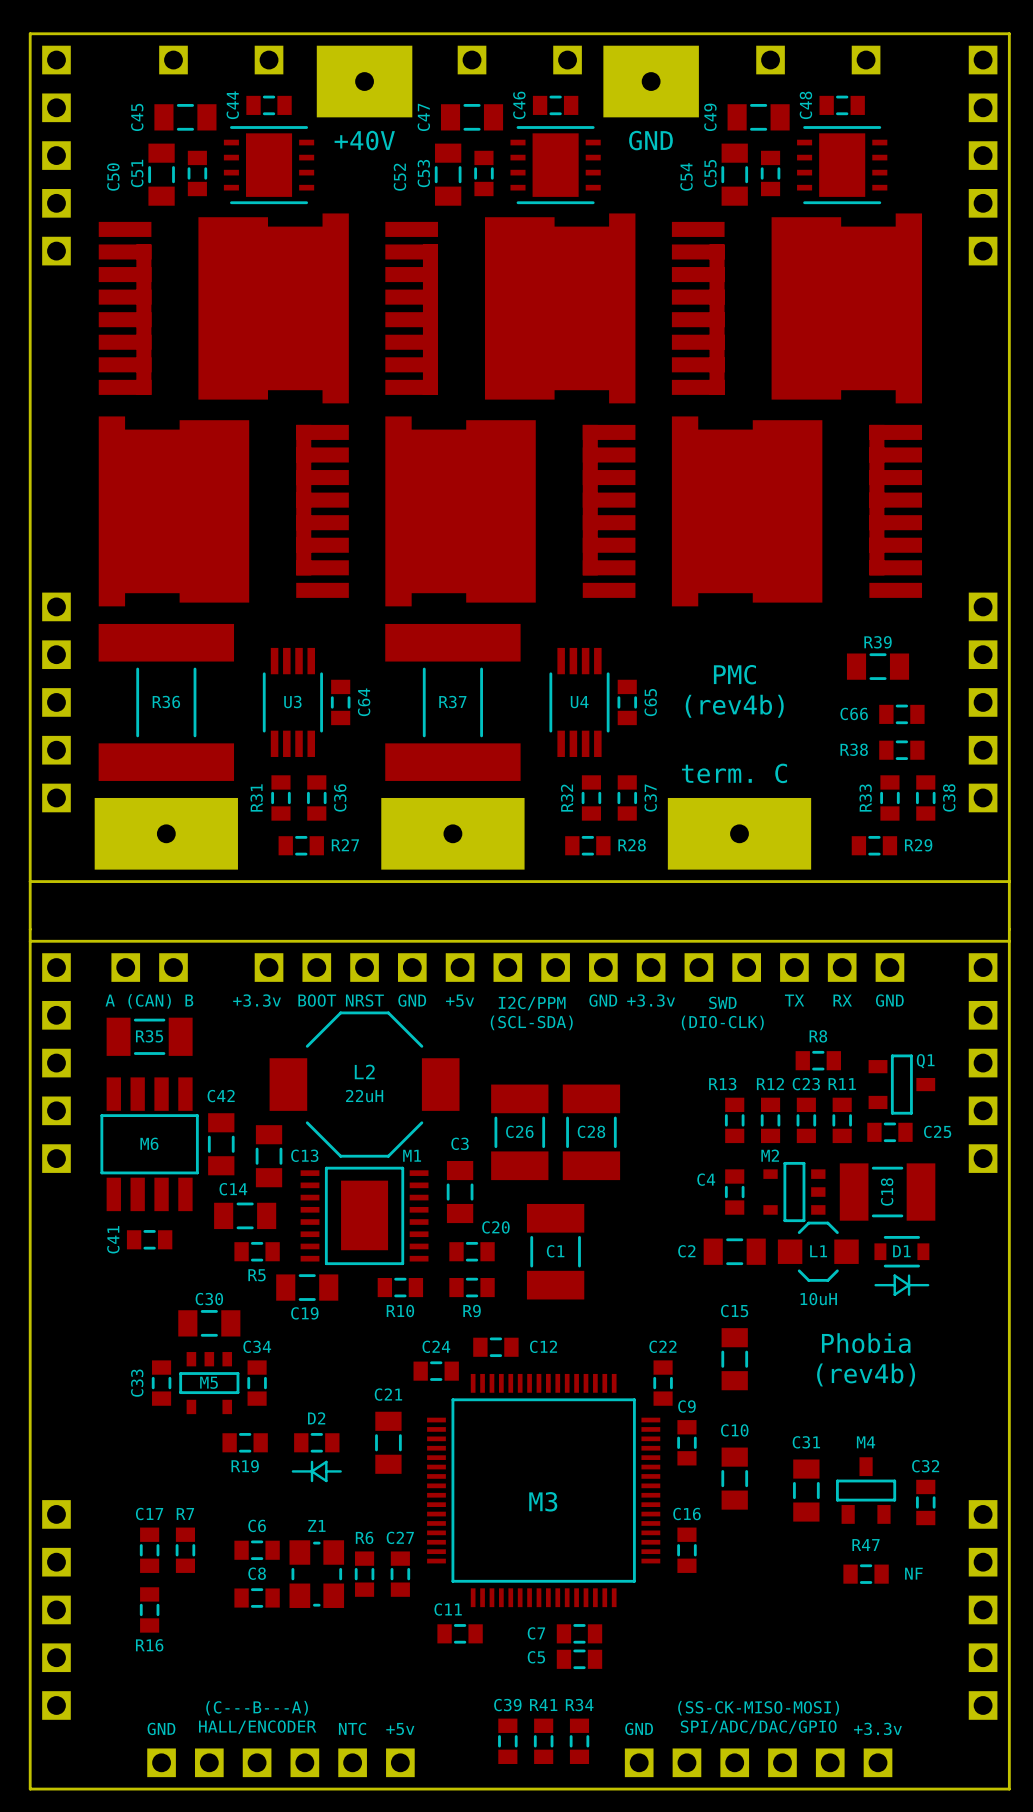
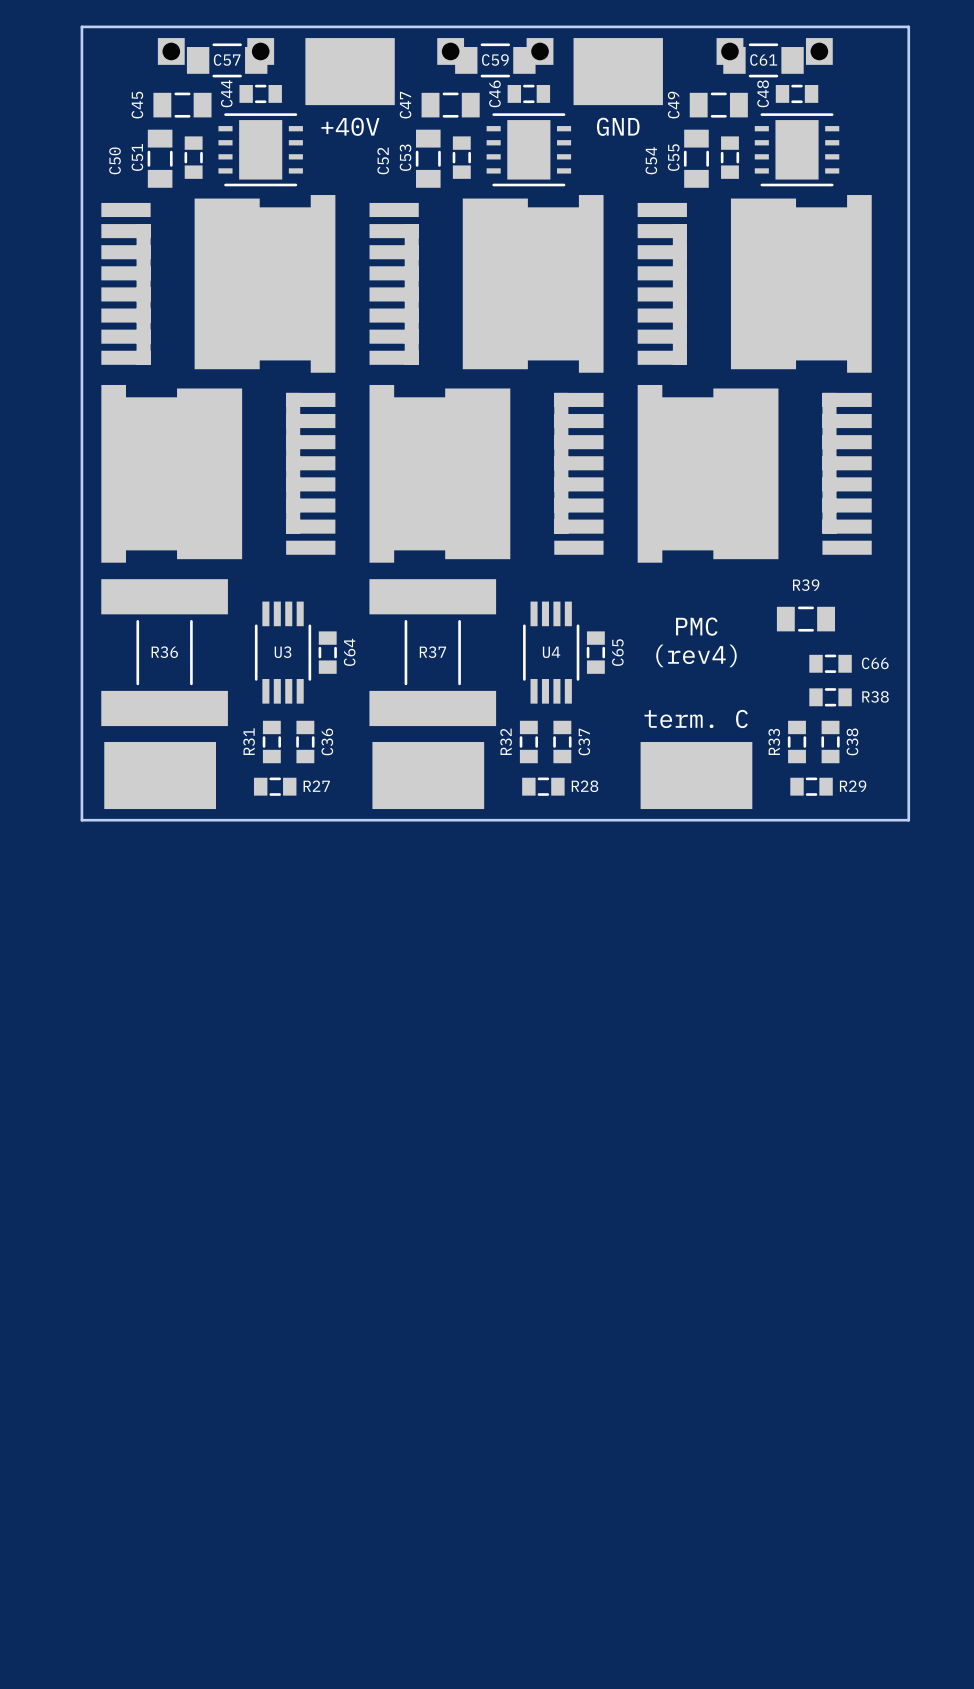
board edge: (77, 33) (30, 33) (30, 1789) (1009, 1789) (1009, 33) (961, 33) -> none
part footprint: [316, 45, 413, 118] -> [305, 38, 395, 106]
part footprint: [603, 45, 699, 118] -> [573, 38, 663, 106]
C57: none -> (227, 60)
C59: none -> (495, 60)
C61: none -> (763, 60)
part: (56, 155) -> none
part: (983, 155) -> none
R39 name position: R39 (878, 642) -> R39 (806, 585)
R39 position: (878, 666) -> (805, 619)
part: (56, 702) -> none
part: (983, 702) -> none
text: (rev4b) (734, 706) -> (rev4) (696, 655)
C66 name position: C66 (854, 713) -> C66 (875, 663)
C66 position: (901, 714) -> (830, 663)
R38 name position: R38 (854, 749) -> R38 (875, 696)
R38 position: (901, 750) -> (830, 697)
part footprint: [94, 797, 238, 870] -> [104, 742, 216, 810]
part footprint: [381, 797, 525, 870] -> [372, 742, 485, 810]
R32: none -> (528, 742)
C37: (627, 797) -> none
part footprint: [667, 797, 812, 870] -> [640, 742, 753, 810]
R33 position: (889, 797) -> (797, 742)
C38 position: (925, 797) -> (830, 742)
R32 name: R32 (567, 798) -> C37 (584, 741)
R27 position: (301, 845) -> (275, 786)
R28 position: (587, 845) -> (543, 786)
R29 position: (874, 845) -> (811, 786)
board edge: (30, 881) (77, 881) -> (81, 26) (81, 820)
board edge: (961, 881) (1009, 881) -> (908, 820) (908, 26)
board edge: (30, 941) (1009, 941) -> none
part: (149, 967) -> none
part: (340, 967) -> none
part: (531, 967) -> none
part: (770, 967) -> none
text: +3.3v (257, 1000) -> none
text: BOOT (317, 1000) -> none
text: NRST (364, 1000) -> none
text: GND (412, 1000) -> none
text: +5v (460, 1000) -> none
text: GND (603, 1000) -> none
text: +3.3v (651, 1000) -> none
text: TX (794, 1000) -> none
text: RX (842, 1000) -> none
text: GND (889, 1000) -> none
text: A (CAN) B (149, 1001) -> none
text: SWD (722, 1002) -> none
text: I2C/PPM (532, 1003) -> none
text: (SCL-SDA) (531, 1022) -> none
text: (DIO-CLK) (722, 1022) -> none
R35: (149, 1036) -> none
R8: (818, 1060) -> none
part: (56, 1063) -> none
part: (983, 1063) -> none
L2: (364, 1084) -> none
Q1: (901, 1084) -> none
text: 22uH (364, 1096) -> none
R13: (734, 1120) -> none
R12: (770, 1120) -> none
C23: (806, 1120) -> none
R11: (842, 1120) -> none
C26: (519, 1132) -> none
C28: (591, 1132) -> none
C25: (889, 1132) -> none
M6: (149, 1144) -> none
C42: (221, 1144) -> none
C13: (269, 1156) -> none
C3: (460, 1192) -> none
C4: (734, 1192) -> none
M2: (794, 1192) -> none
C18: (887, 1192) -> none
C14: (245, 1215) -> none
M1: (364, 1215) -> none
C41: (149, 1239) -> none
R5: (257, 1251) -> none
C20: (472, 1251) -> none
C1: (555, 1251) -> none
C2: (734, 1251) -> none
L1: (818, 1251) -> none
D1: (901, 1251) -> none
line: (909, 1275) (909, 1294) -> none
line: (875, 1285) (894, 1285) -> none
line: (909, 1285) (928, 1285) -> none
line: (909, 1285) (894, 1275) (894, 1294) (909, 1285) -> none
C19: (307, 1287) -> none
R10: (400, 1287) -> none
R9: (472, 1287) -> none
text: 10uH (818, 1299) -> none
C30: (209, 1323) -> none
text: Phobia (866, 1343) -> none
C12: (495, 1347) -> none
C15: (734, 1359) -> none
C24: (436, 1371) -> none
text: (rev4b) (866, 1374) -> none
C33: (161, 1383) -> none
M5: (209, 1383) -> none
C34: (257, 1383) -> none
C22: (663, 1383) -> none
R19: (245, 1442) -> none
D2: (316, 1442) -> none
C21: (388, 1442) -> none
C9: (686, 1442) -> none
line: (312, 1461) (312, 1480) -> none
line: (292, 1471) (312, 1471) -> none
line: (312, 1471) (326, 1461) (326, 1480) (312, 1471) -> none
line: (326, 1471) (340, 1471) -> none
C10: (734, 1478) -> none
M3: (543, 1490) -> none
C31: (806, 1490) -> none
M4: (866, 1490) -> none
C32: (925, 1502) -> none
C17: (149, 1550) -> none
R7: (185, 1550) -> none
C6: (257, 1550) -> none
C16: (686, 1550) -> none
Z1: (316, 1574) -> none
R6: (364, 1574) -> none
C27: (400, 1574) -> none
R47: NF (866, 1574) -> none
C8: (257, 1598) -> none
part: (56, 1609) -> none
R16: (149, 1609) -> none
part: (983, 1609) -> none
C11: (460, 1633) -> none
C7: (579, 1633) -> none
C5: (579, 1659) -> none
text: (C---B---A) (257, 1708) -> none
text: (SS-CK-MISO-MOSI) (758, 1708) -> none
text: HALL/ENCODER (257, 1727) -> none
text: SPI/ADC/DAC/GPIO (758, 1727) -> none
text: GND (161, 1728) -> none
text: NTC (352, 1728) -> none
text: GND (639, 1728) -> none
text: +3.3v (877, 1728) -> none
text: +5v (400, 1729) -> none
C39: (507, 1741) -> none
R41: (543, 1741) -> none
R34: (579, 1741) -> none
part: (280, 1762) -> none
part: (758, 1762) -> none

